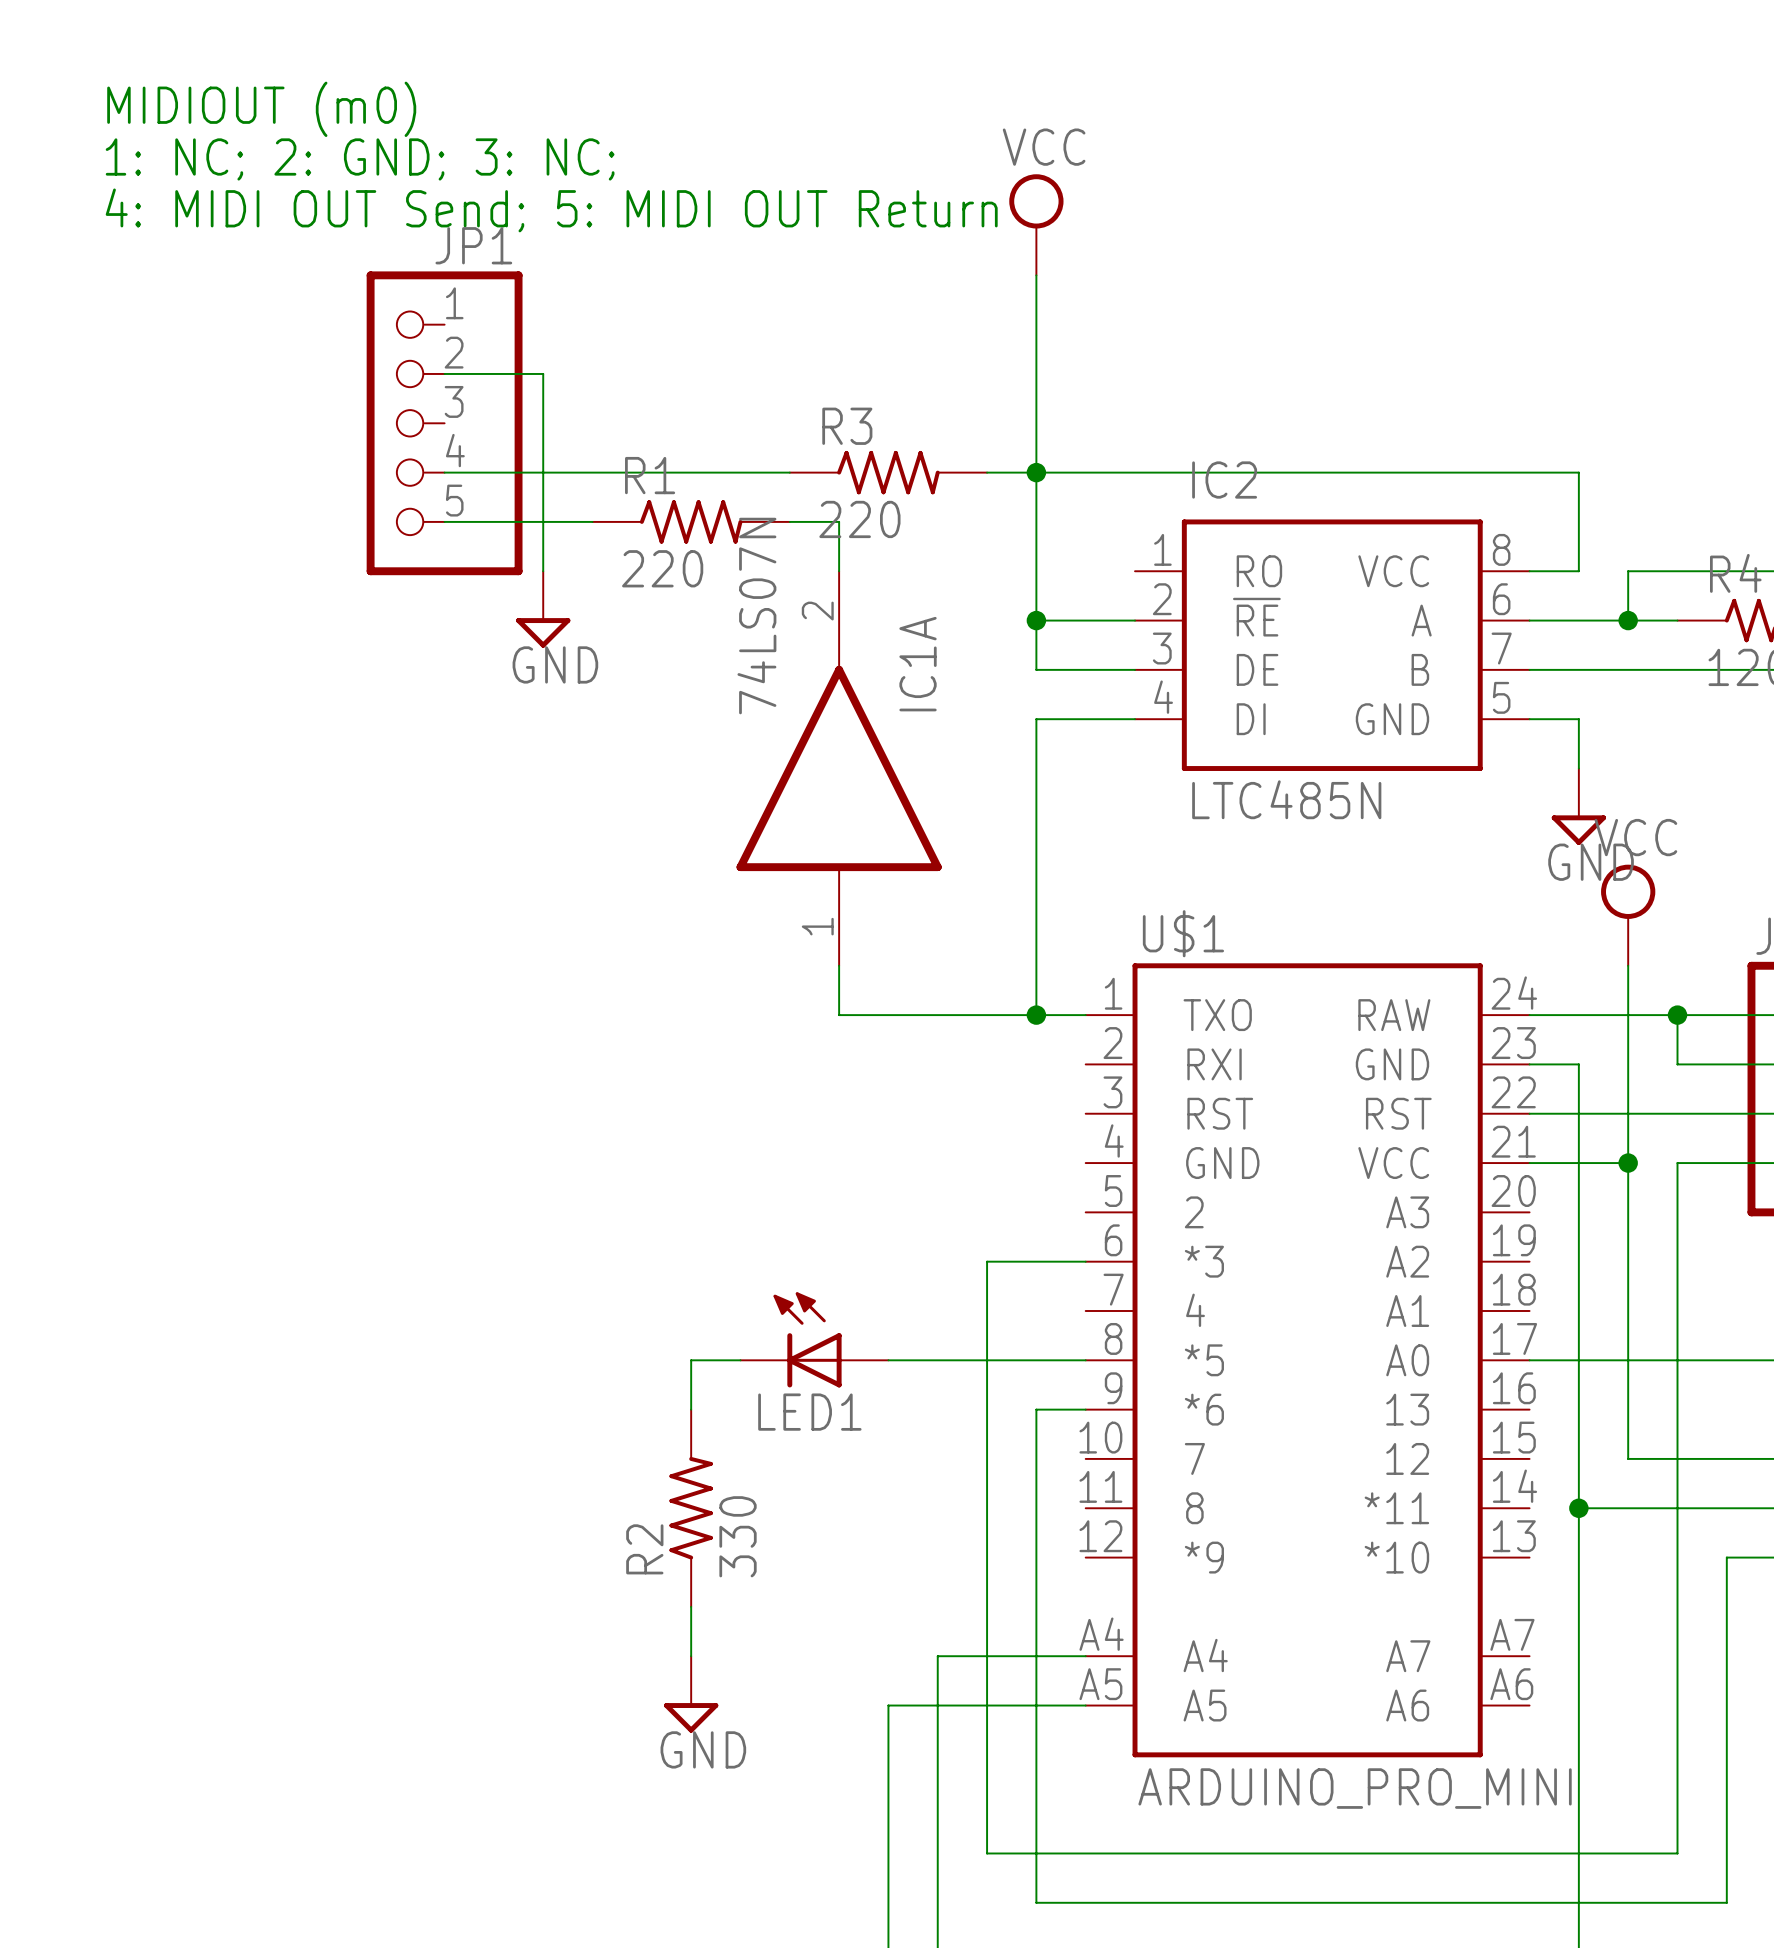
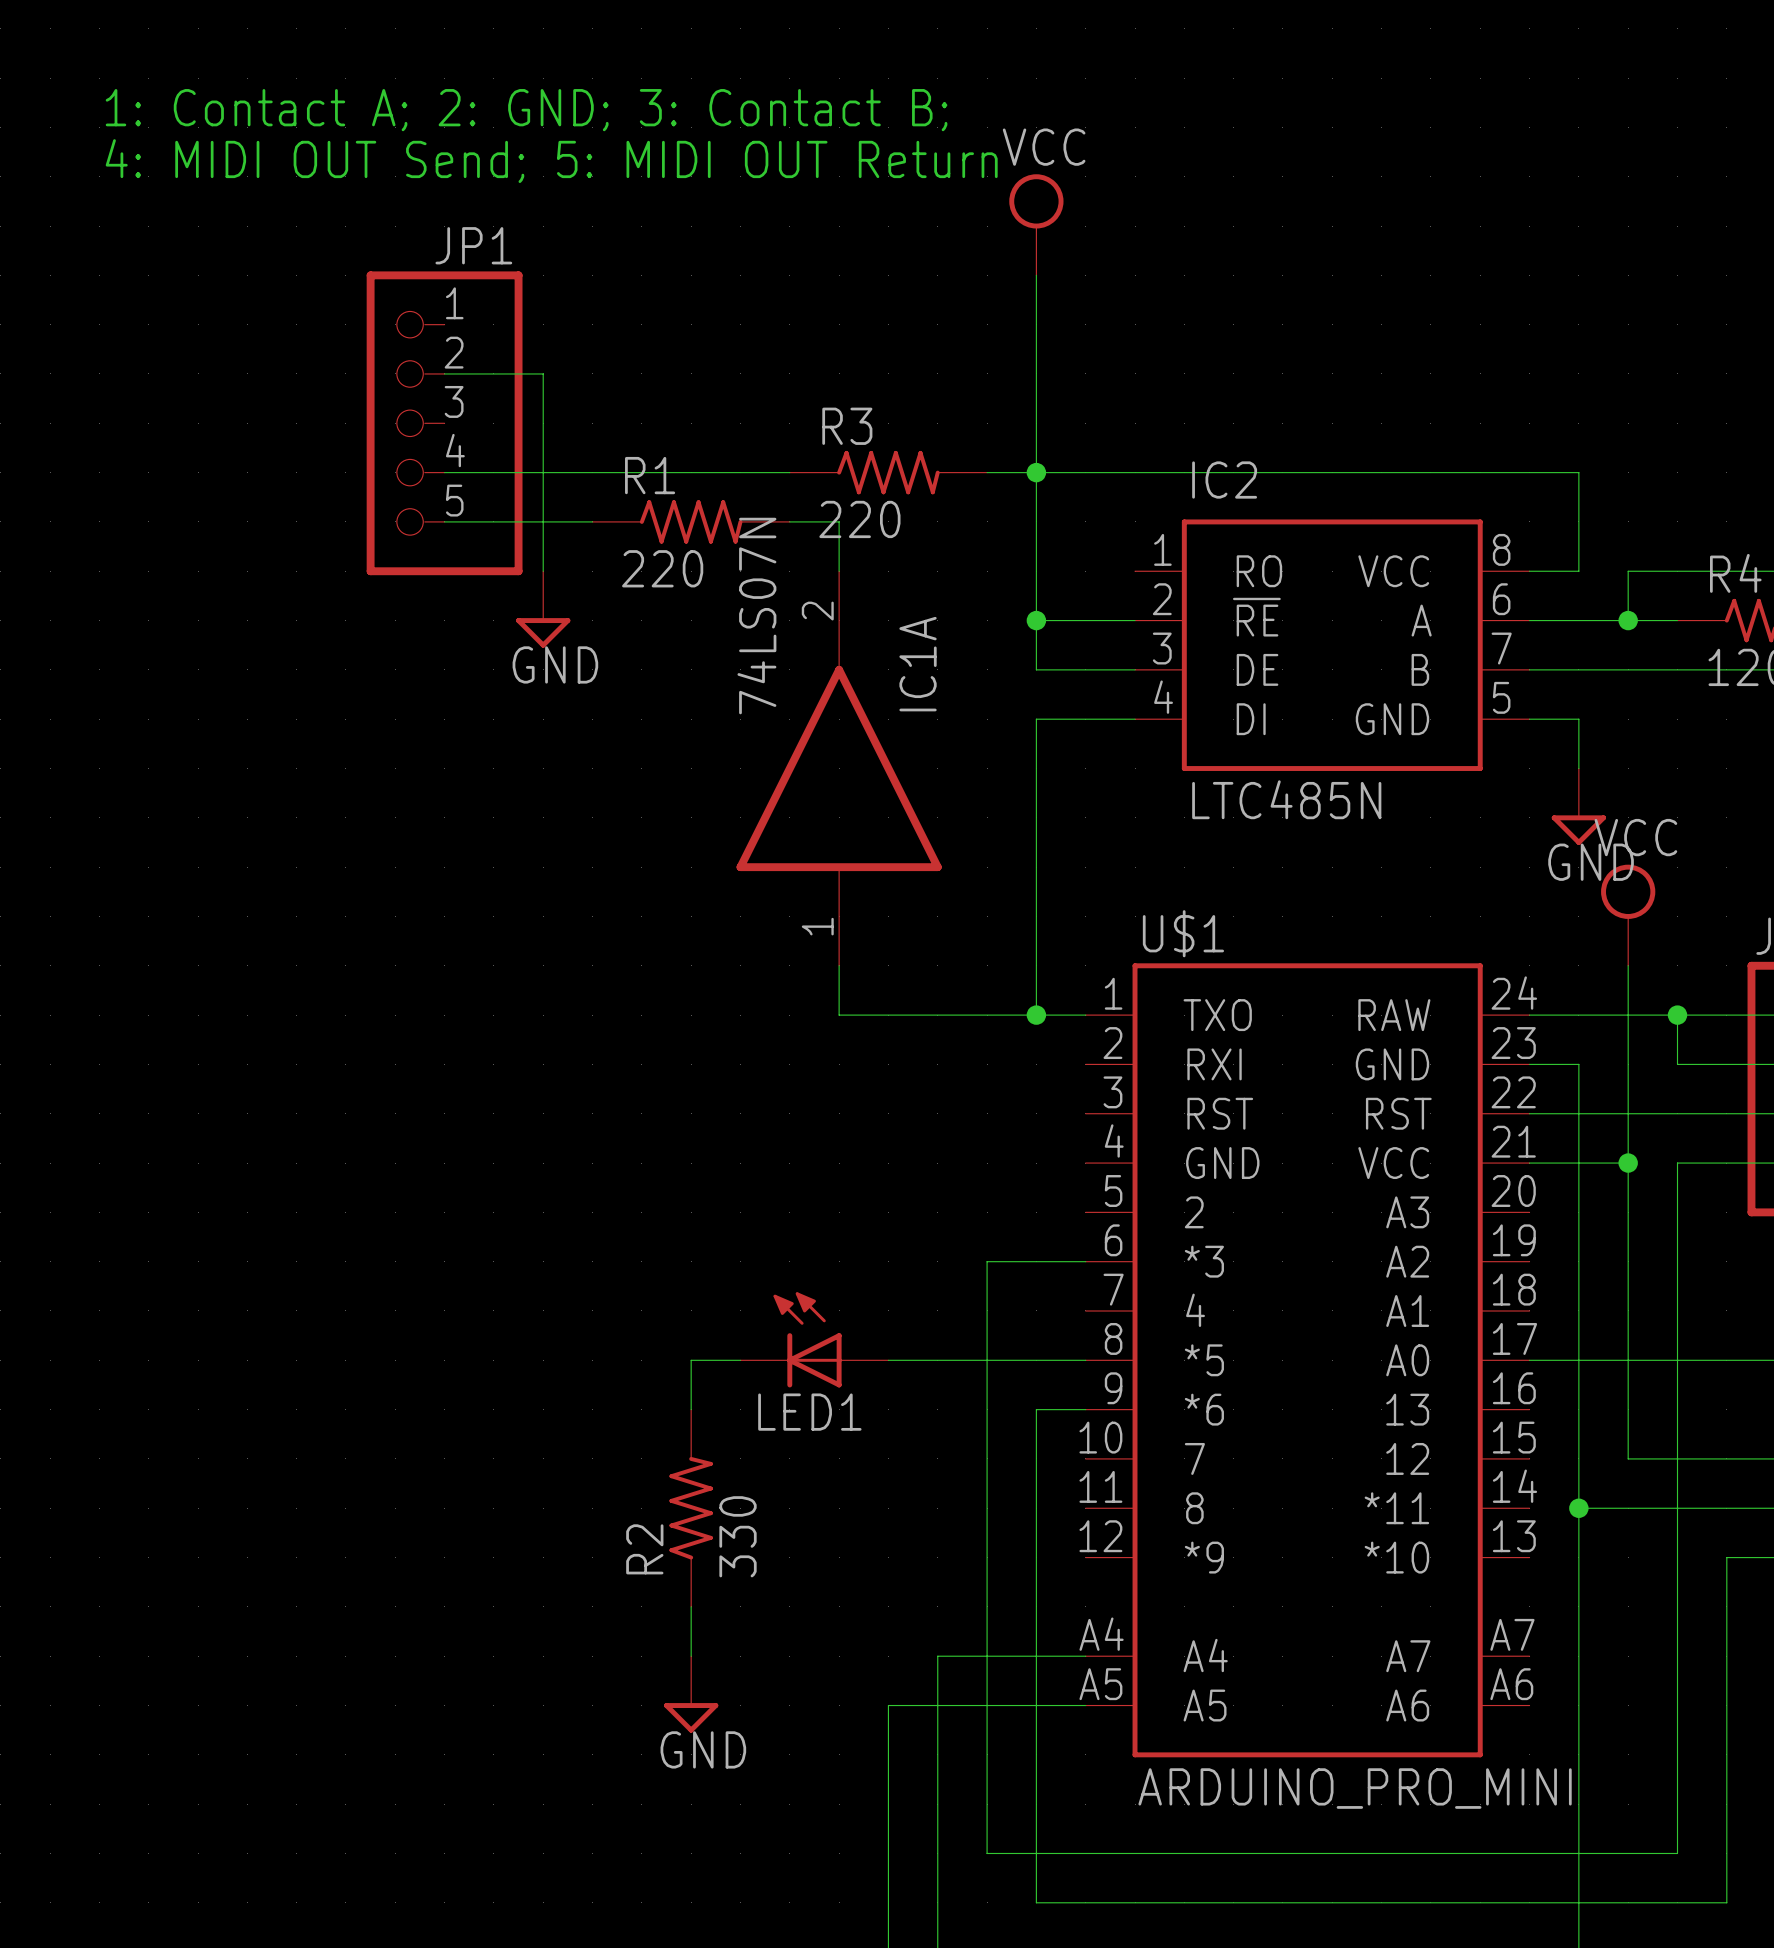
text: MIDIOUT (m0) (261, 109) -> 1: Contact A; 2: GND; 3: Contact B; (526, 110)
text: 1: NC; 2: GND; 3: NC; (360, 159) -> 4: MIDI OUT Send; 5: MIDI OUT Return (551, 161)
text: 4: MIDI OUT Send; 5: MIDI OUT Return (551, 210) -> none

